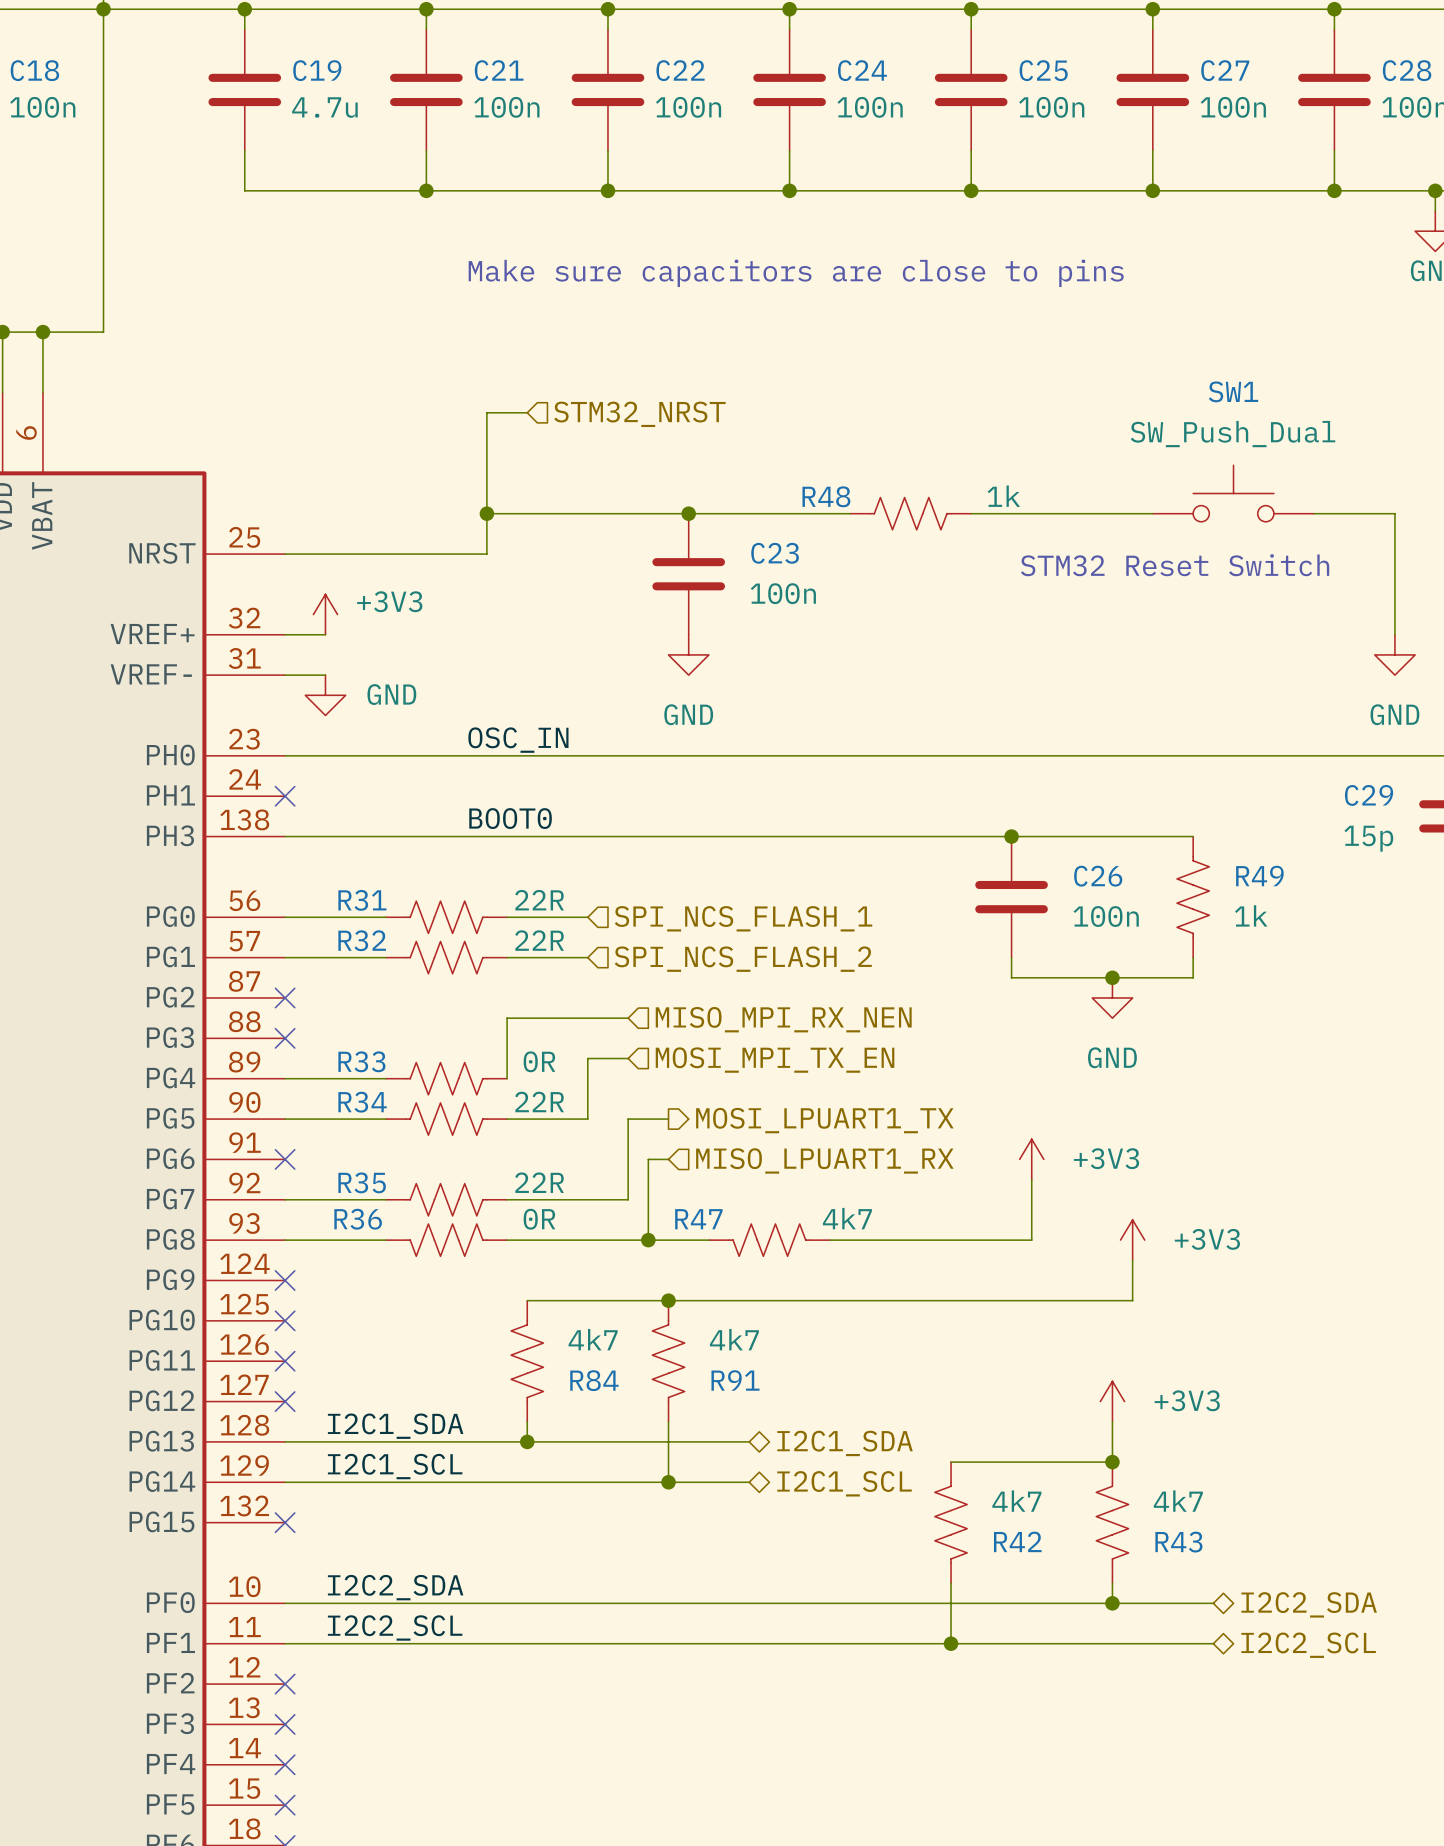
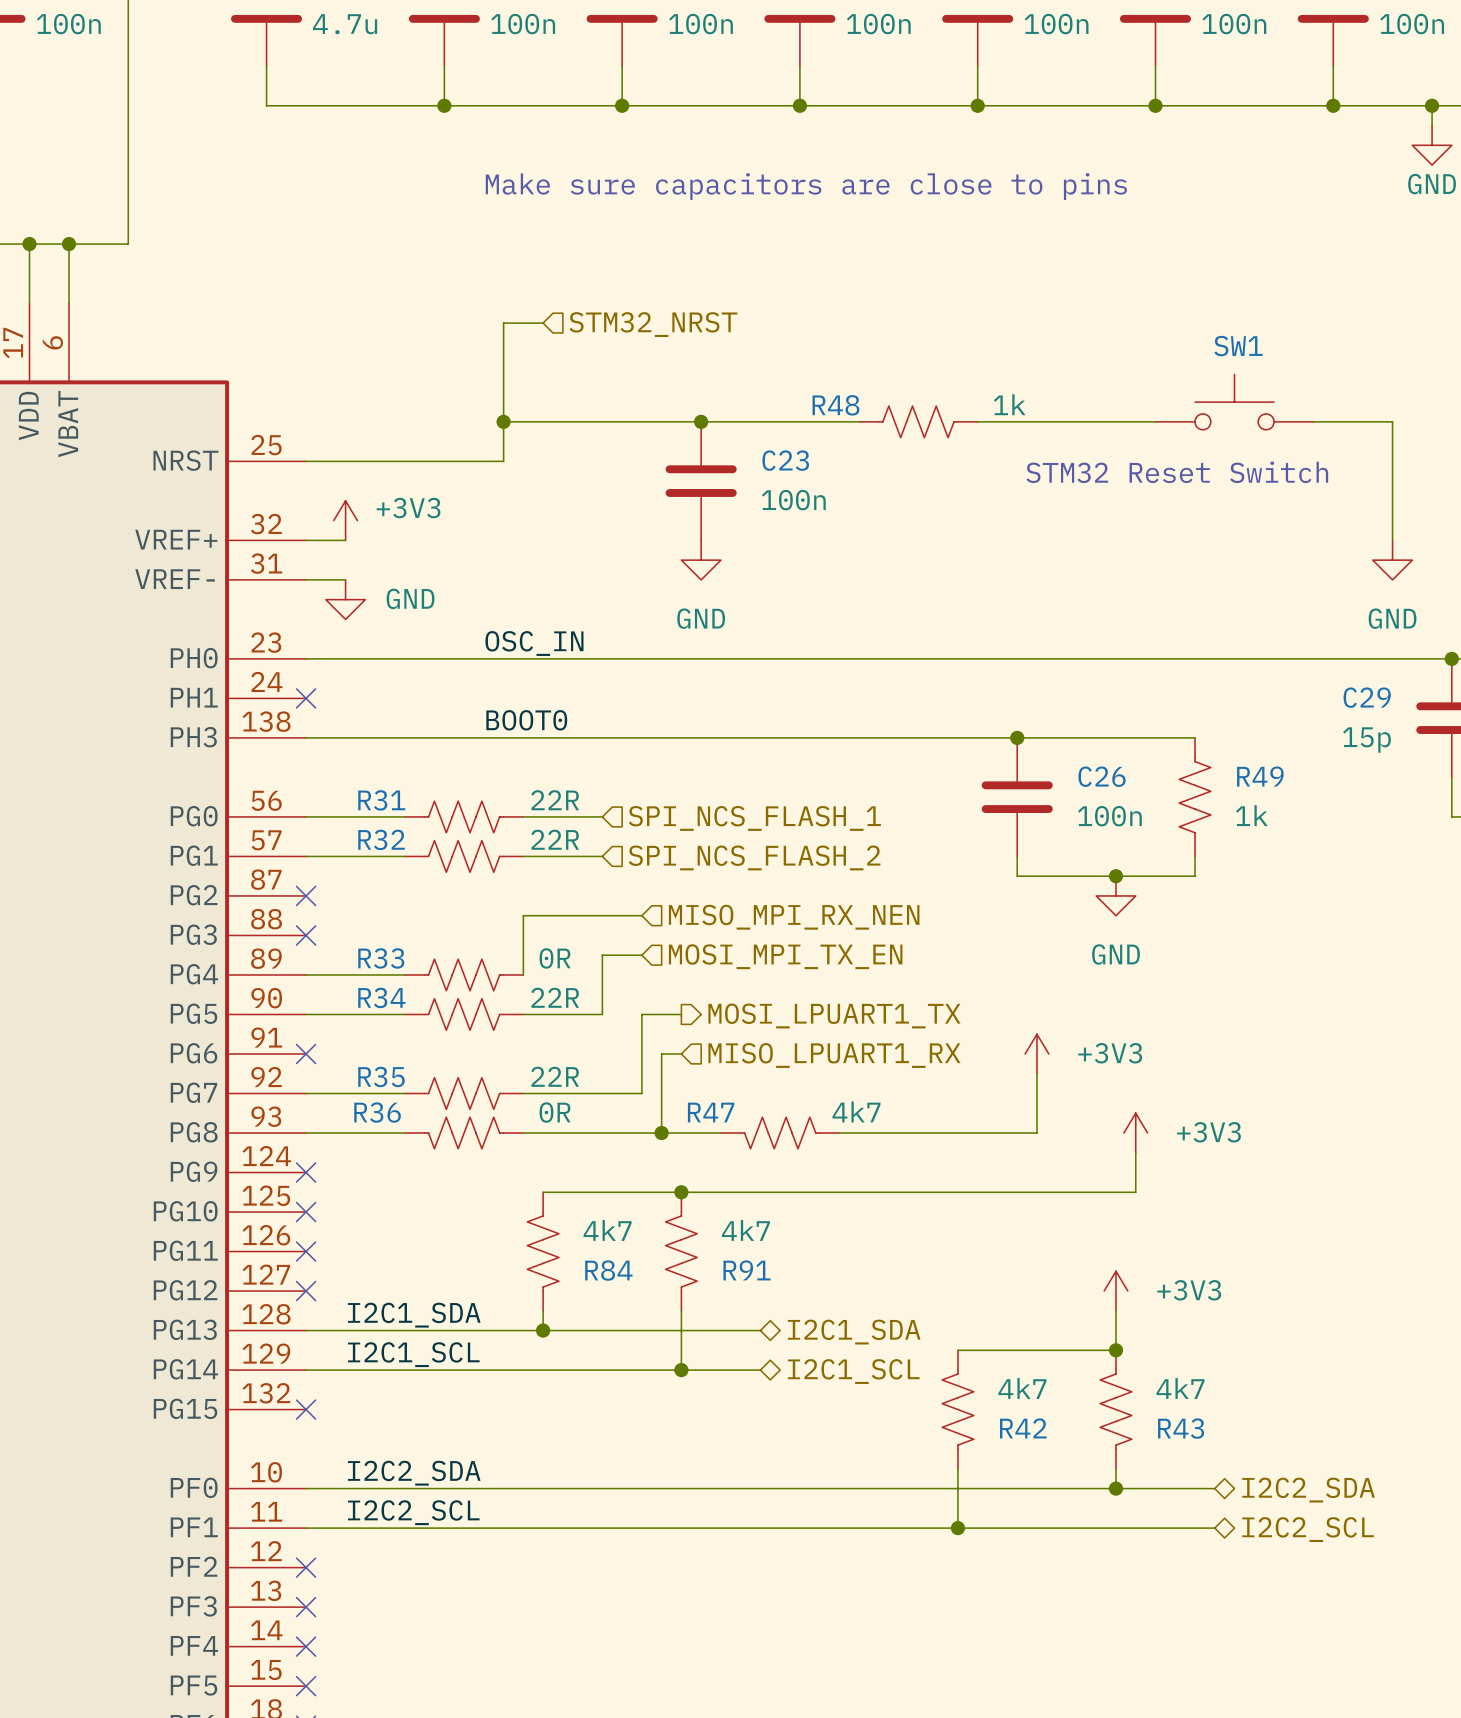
SW1 name position: SW1 (1233, 391) -> SW1 (1238, 346)
SW1 value: SW_Push_Dual (1233, 434) -> none

